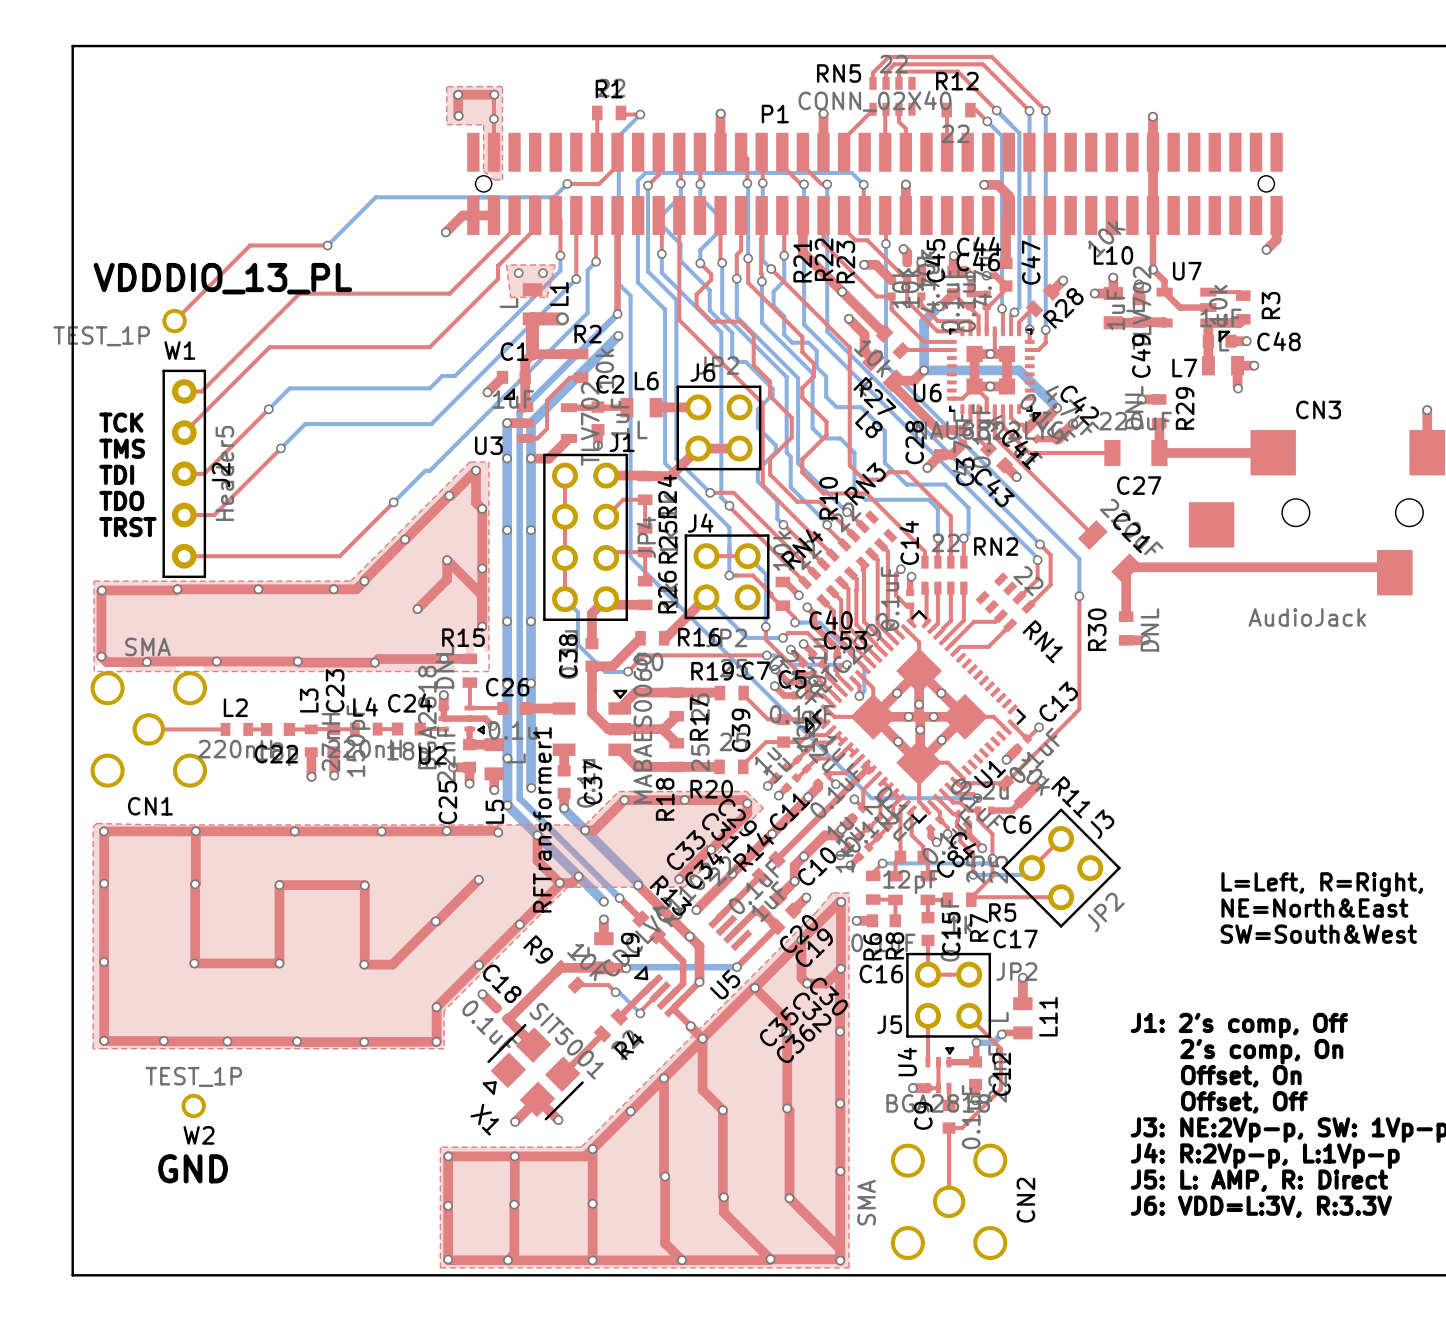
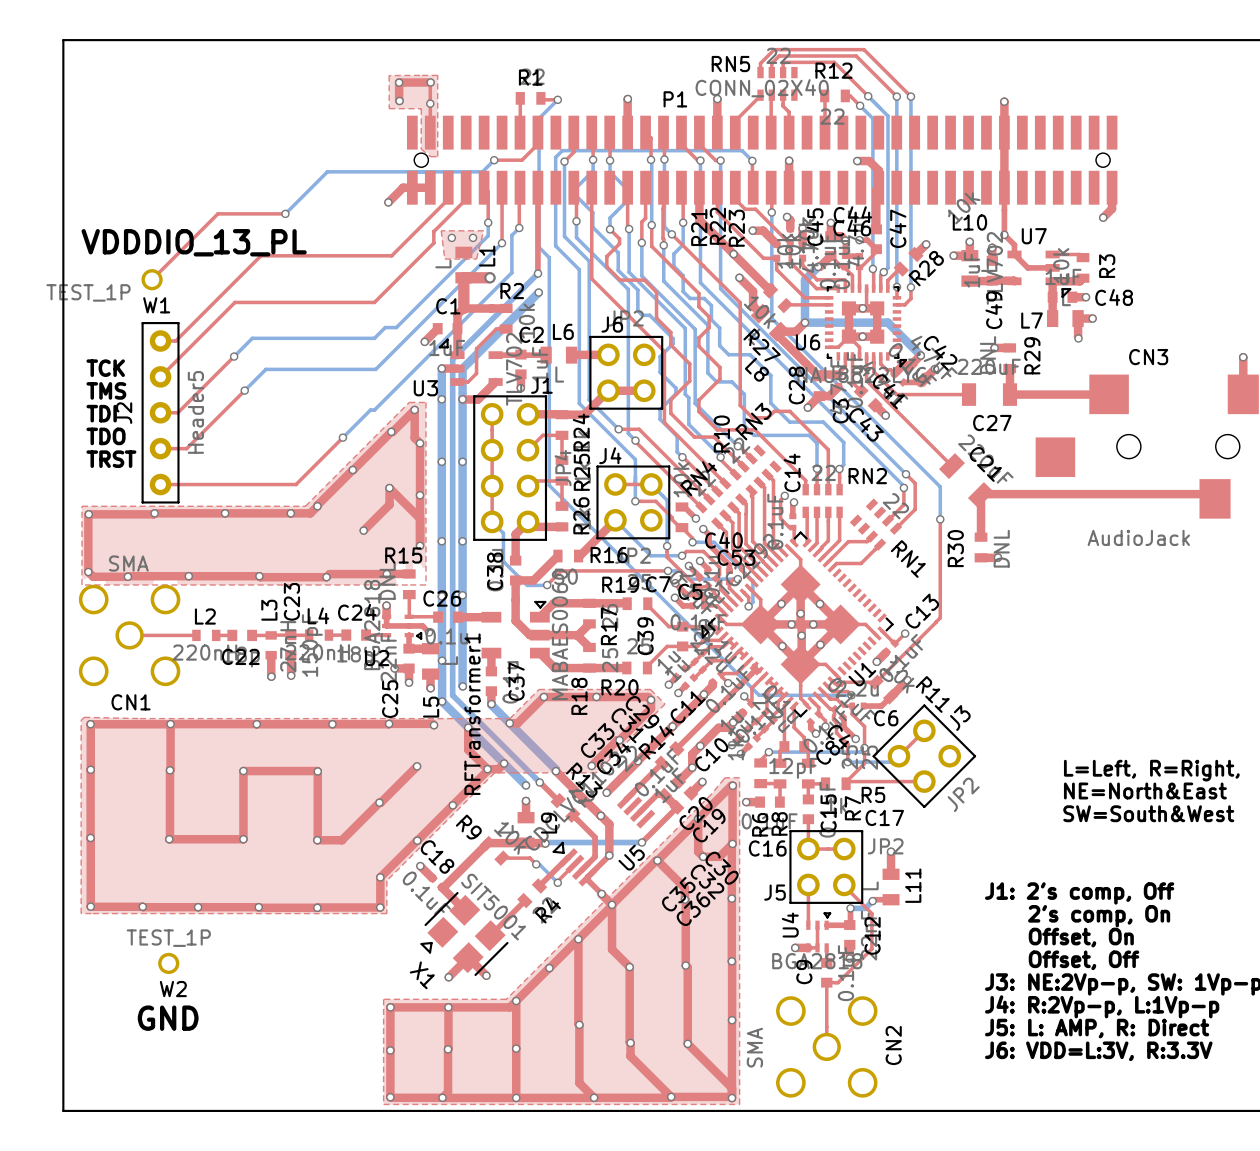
J2 name position: J2 (221, 475) -> J2 (124, 413)

